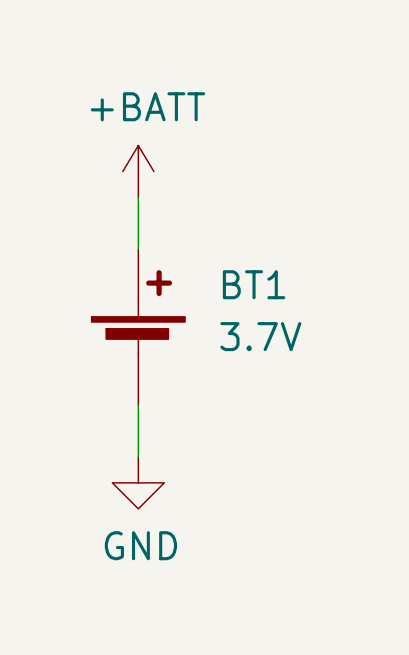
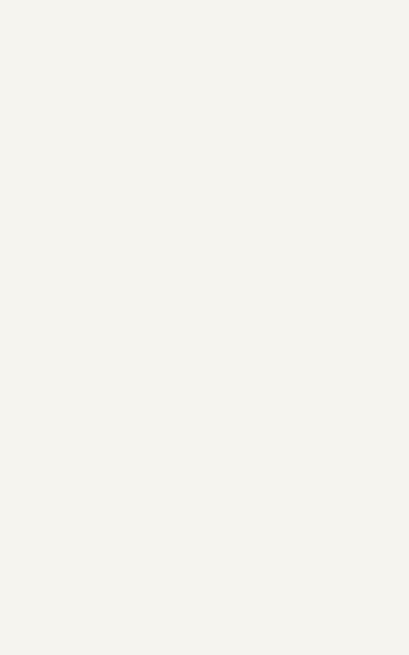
power symbol: +BATT (138, 171) -> none
wire: (138, 197) (138, 249) -> none
BT1: 3.7V (138, 327) -> none
wire: (138, 405) (138, 456) -> none
power symbol: GND (138, 482) -> none

